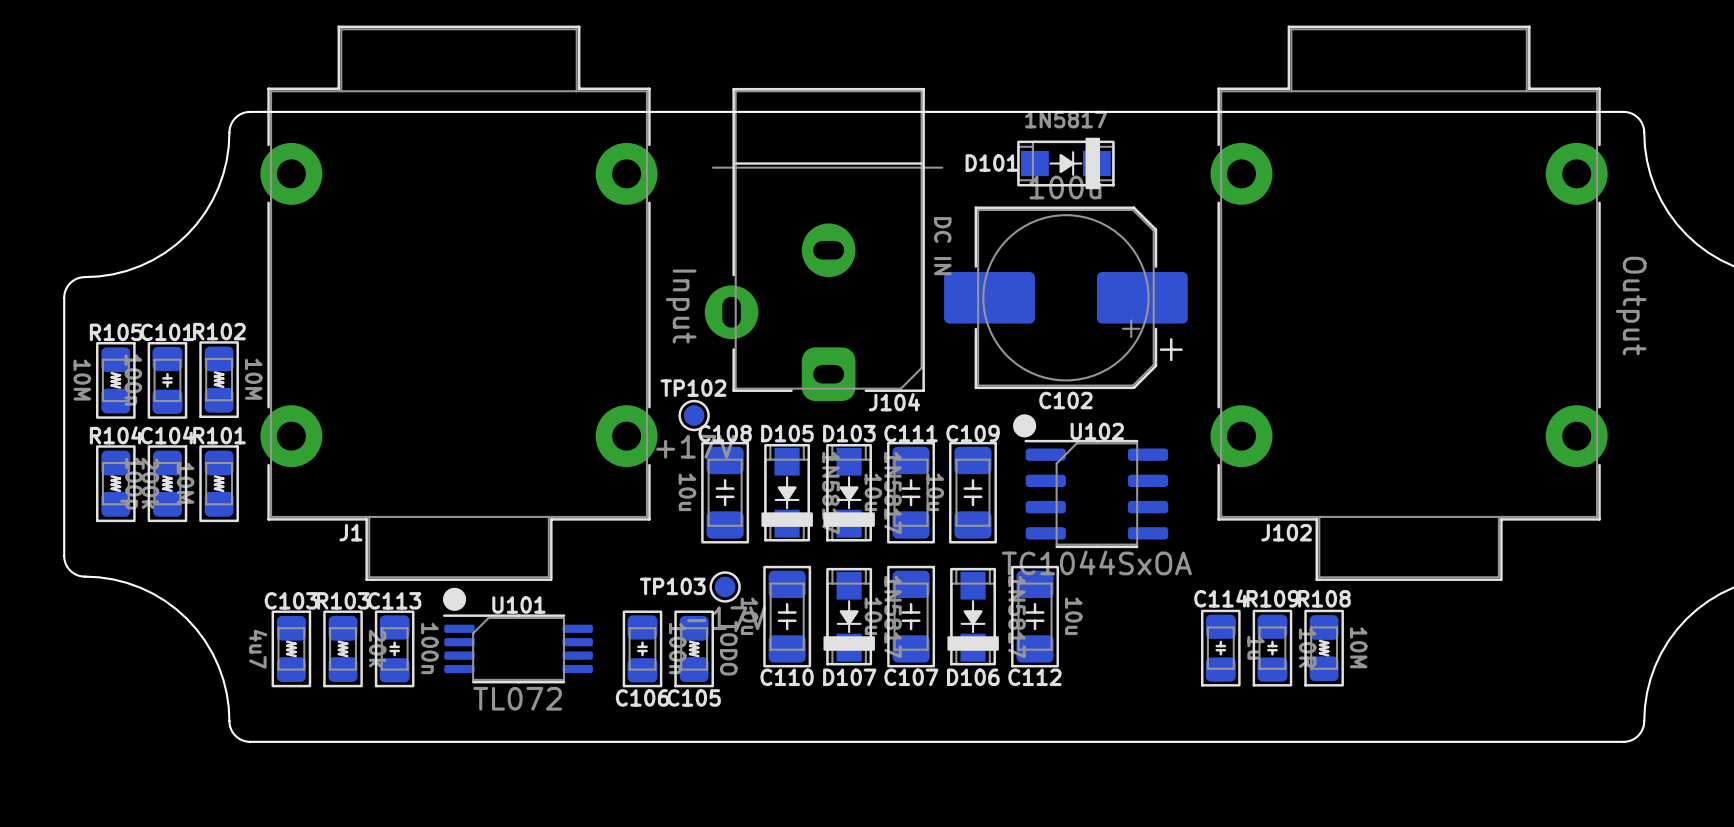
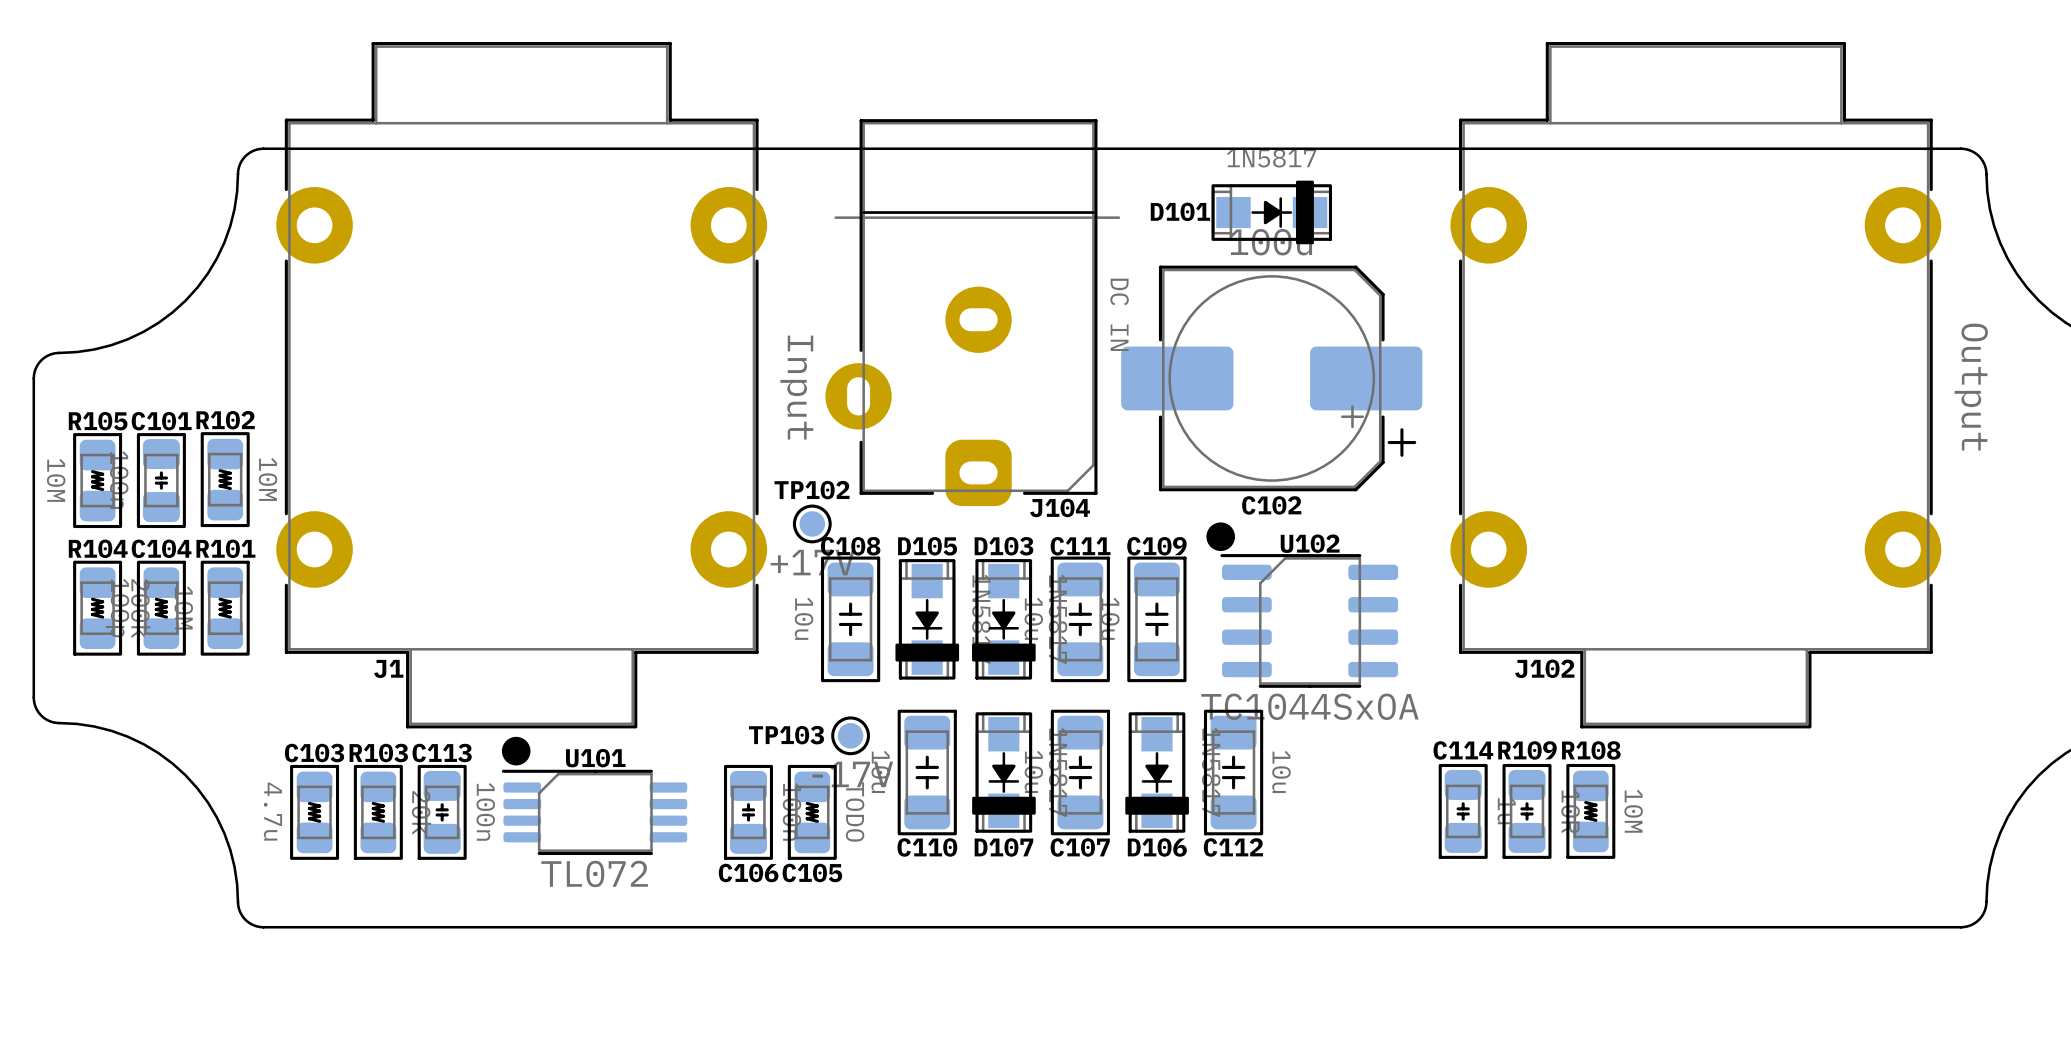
C103 value: 4u7 (258, 649) -> 4.7u (272, 811)

